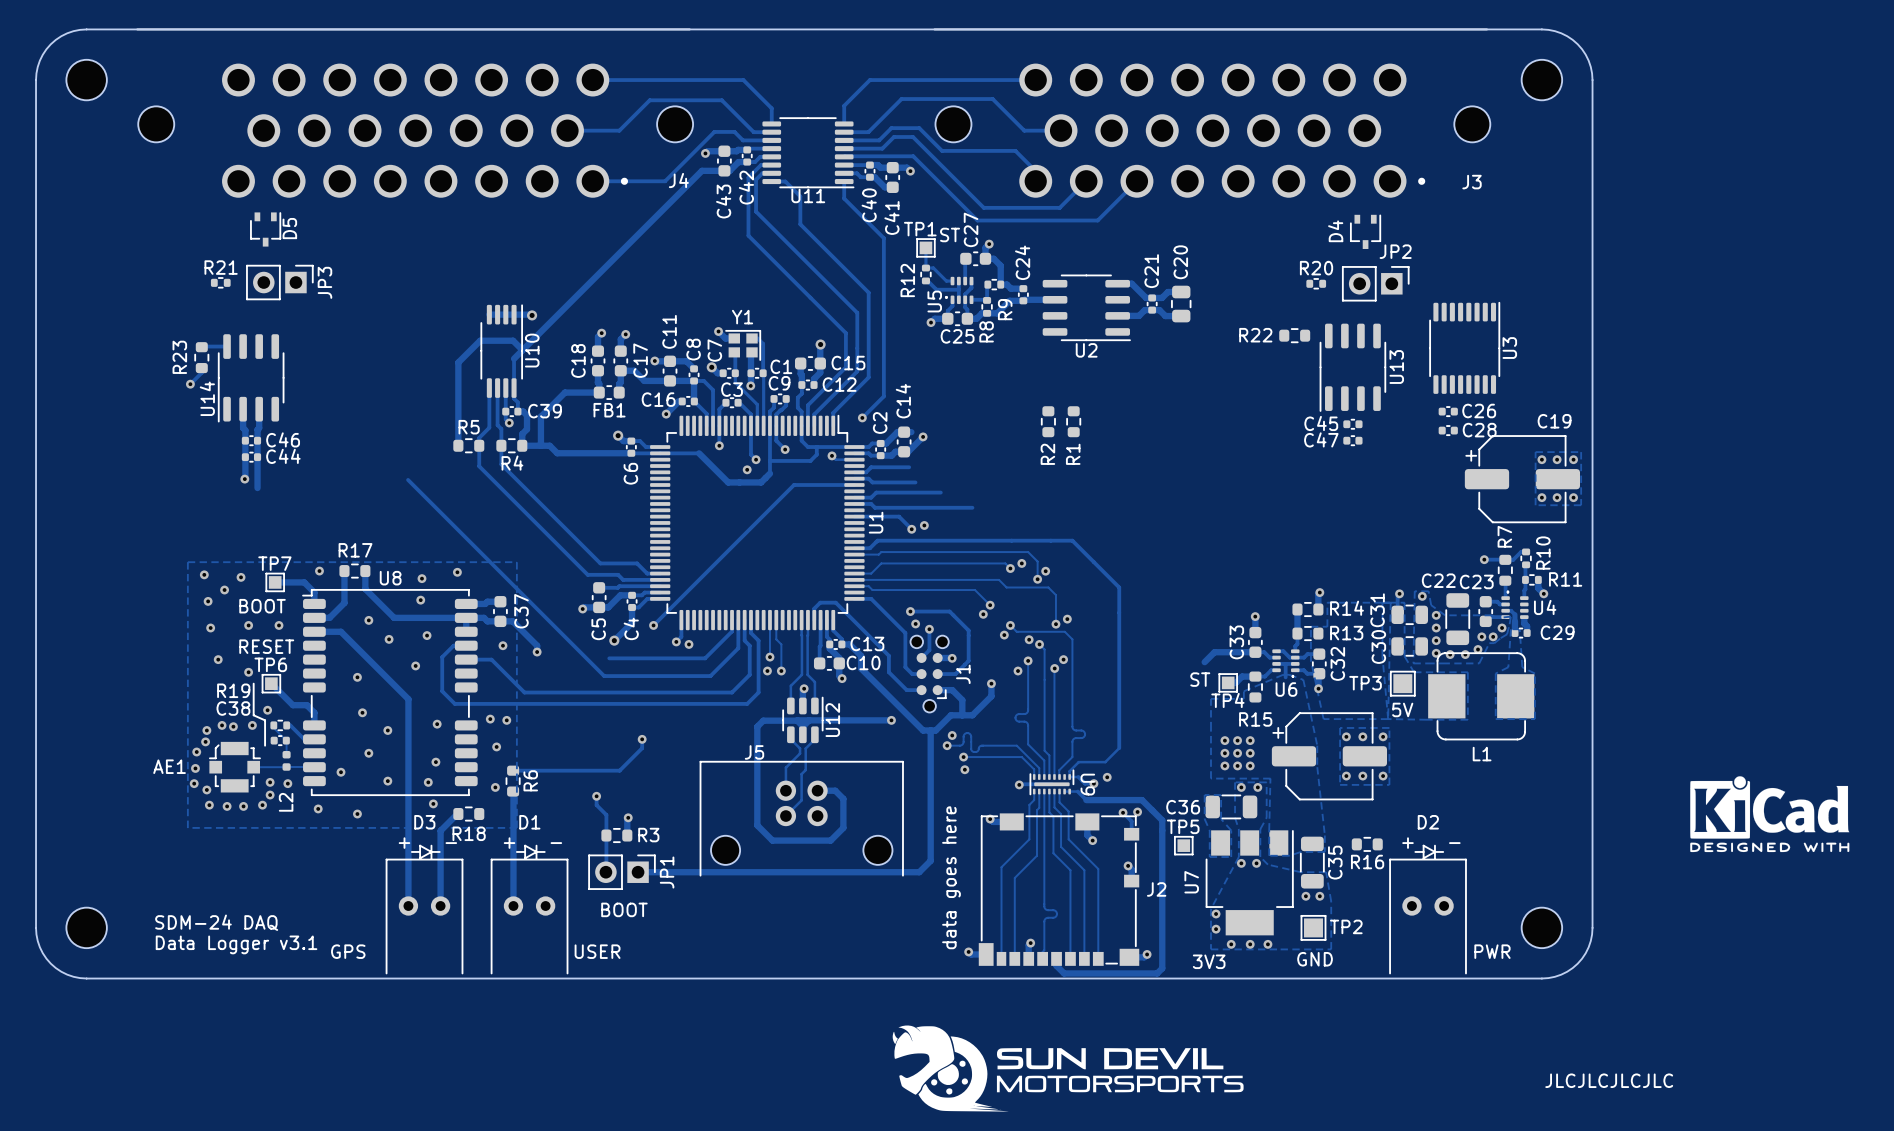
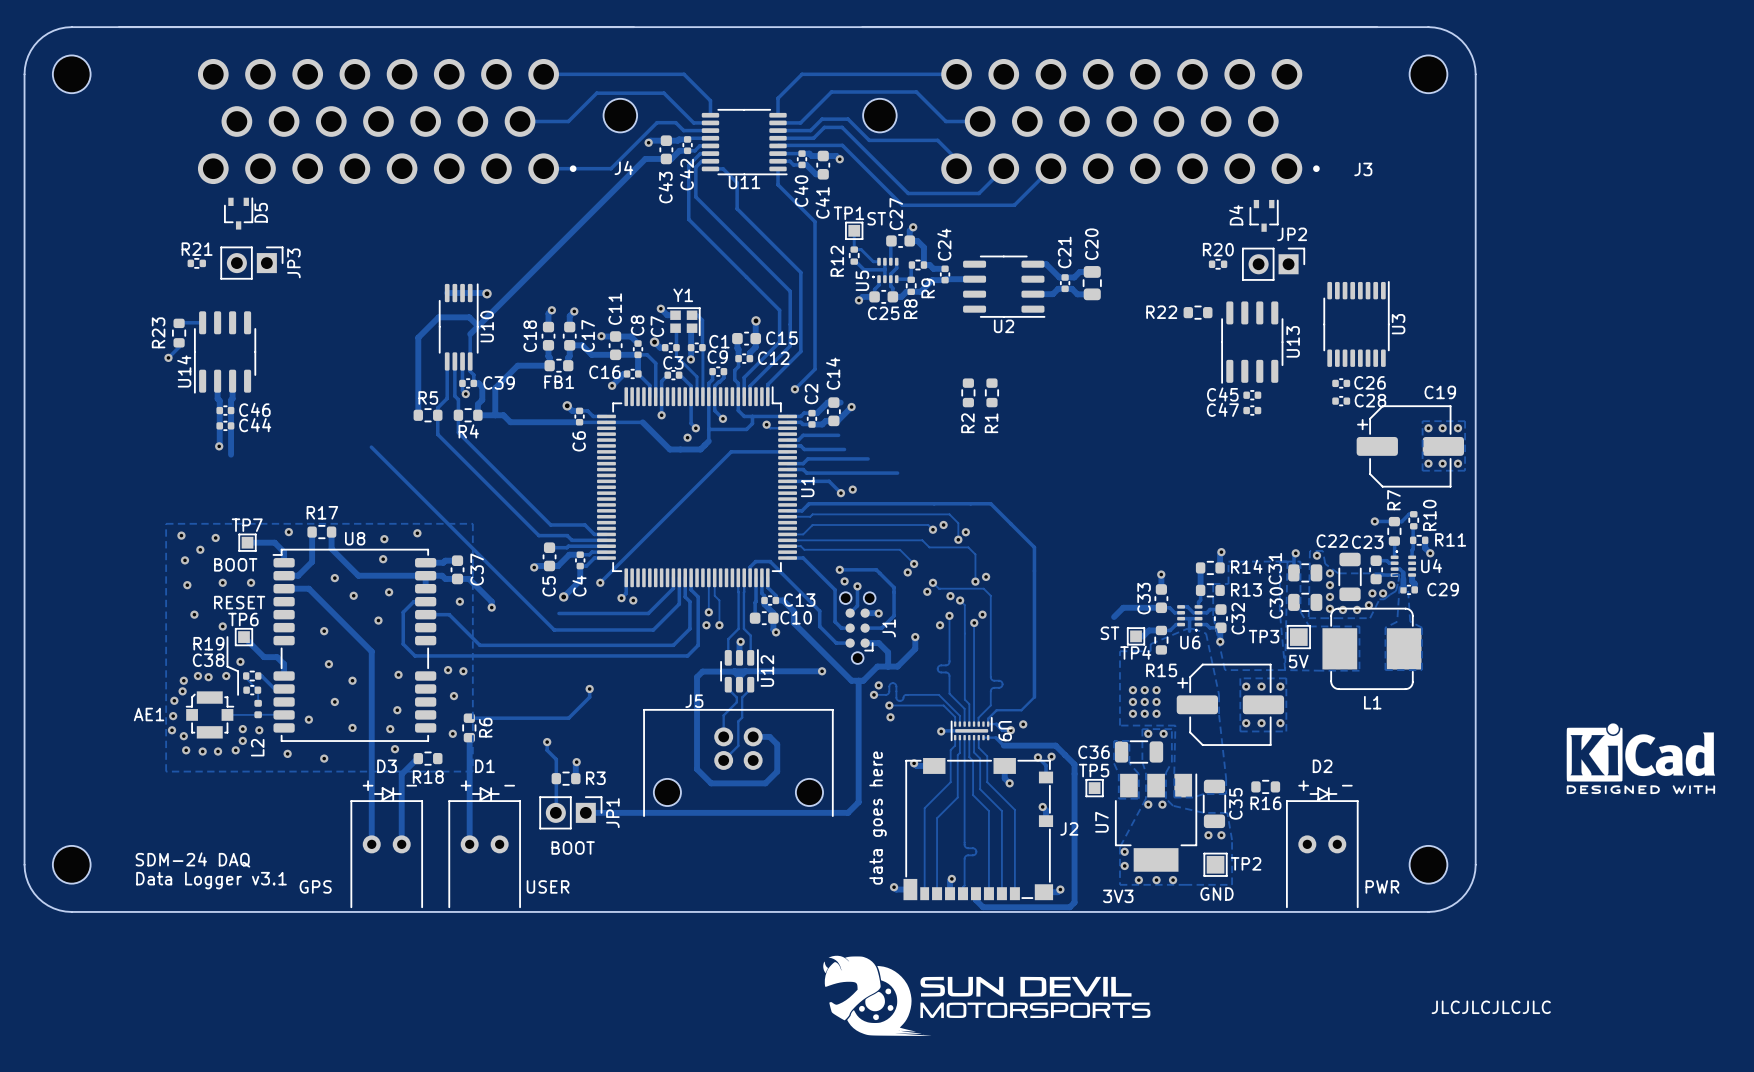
J4 footprint: [136, 28, 694, 198] -> [118, 26, 638, 185]
J3 footprint: [933, 28, 1491, 198] -> [861, 26, 1379, 185]

